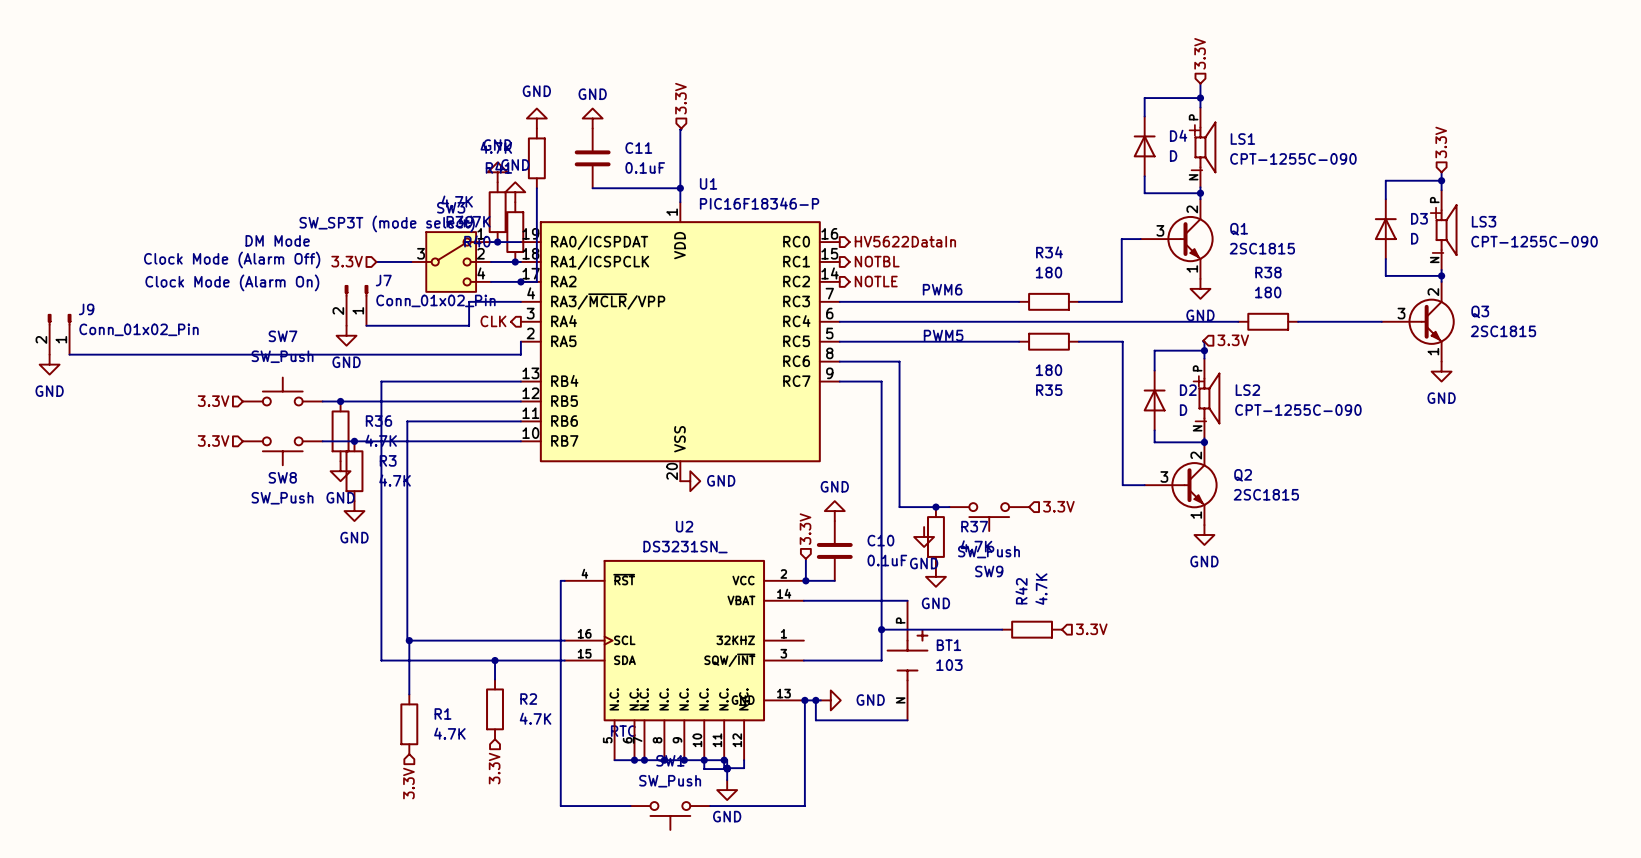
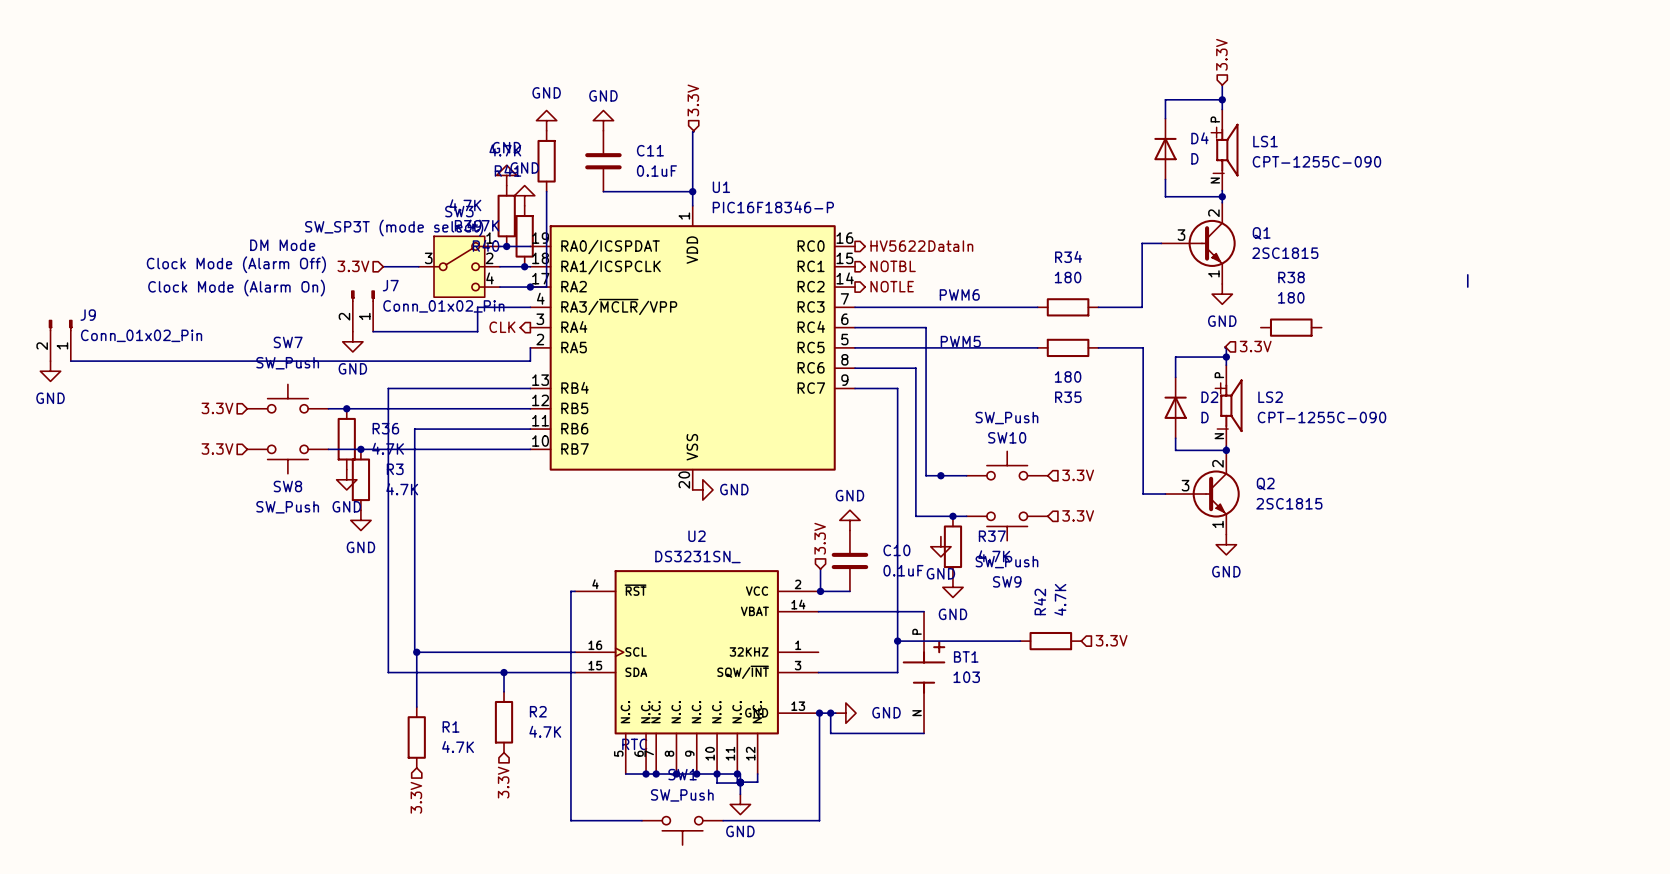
hierarchical label: 3.3V (1441, 142) -> none
wire: (1441, 172) (1441, 190) -> none
wire: (1441, 180) (1385, 180) (1385, 199) -> none
junction: (1441, 180) -> none
D3: D (1385, 229) -> none
LS3: CPT-1255C-090 (1446, 230) -> none
wire: (1385, 259) (1385, 275) (1441, 275) -> none
junction: (1441, 275) -> none
wire: (909, 321) (1238, 321) -> (926, 327) (926, 475) (966, 475)
wire: (1298, 321) (1381, 321) -> none
Q3: 2SC1815 (1418, 321) -> none
power symbol: GND (1441, 371) -> none
SW10: none -> SW_Push (1007, 465)
hierarchical label: none -> 3.3V (1078, 475)
junction: none -> (940, 475)

